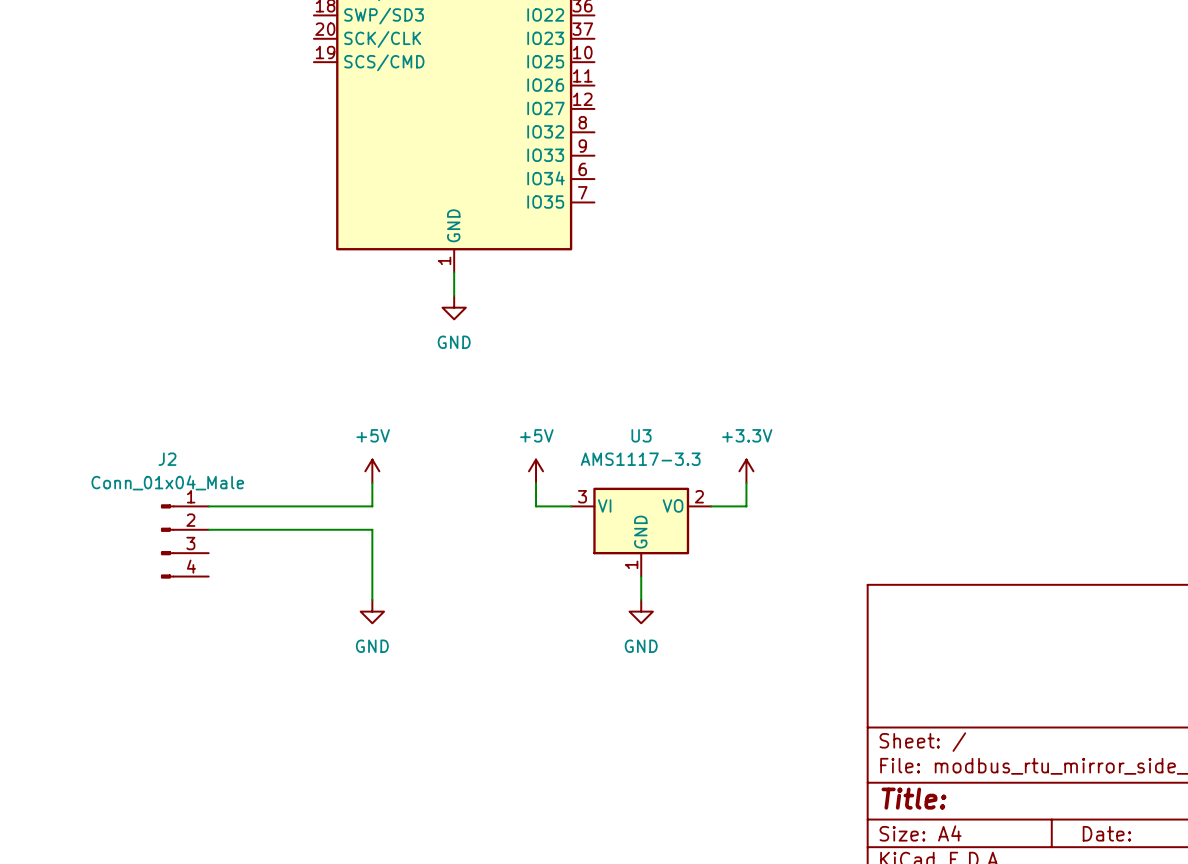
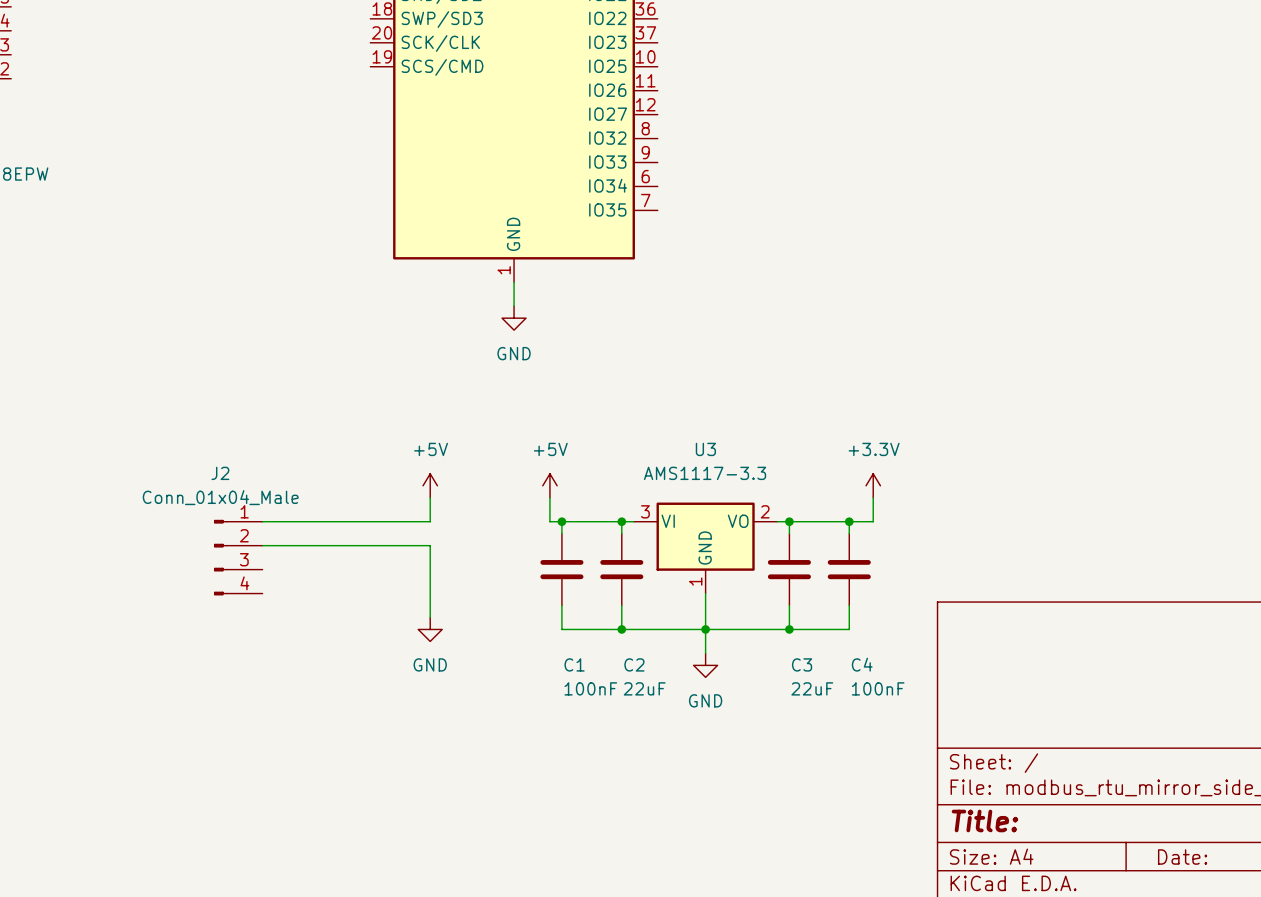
power symbol position: +5V (536, 471) -> +5V (549, 485)
power symbol position: +3.3V (746, 471) -> +3.3V (873, 485)
wire: (536, 483) (536, 506) -> (549, 497) (549, 521) (597, 521)
wire: (746, 483) (746, 506) -> (873, 497) (873, 521) (813, 521)
wire: none -> (561, 521) (561, 533)
junction: none -> (561, 521)
wire: none -> (621, 521) (621, 533)
junction: none -> (621, 521)
wire: none -> (789, 521) (789, 533)
junction: none -> (789, 521)
wire: none -> (849, 521) (849, 533)
junction: none -> (849, 521)
C1: none -> 100nF (561, 569)
C2: none -> 22uF (621, 569)
C3: none -> 22uF (789, 569)
C4: none -> 100nF (849, 569)
wire: none -> (561, 605) (561, 629) (849, 629) (849, 605)
wire: none -> (621, 605) (621, 629)
wire: none -> (789, 605) (789, 629)
wire: none -> (705, 617) (705, 653)
junction: none -> (621, 629)
power symbol position: GND (641, 611) -> GND (705, 665)
junction: none -> (705, 629)
junction: none -> (789, 629)

